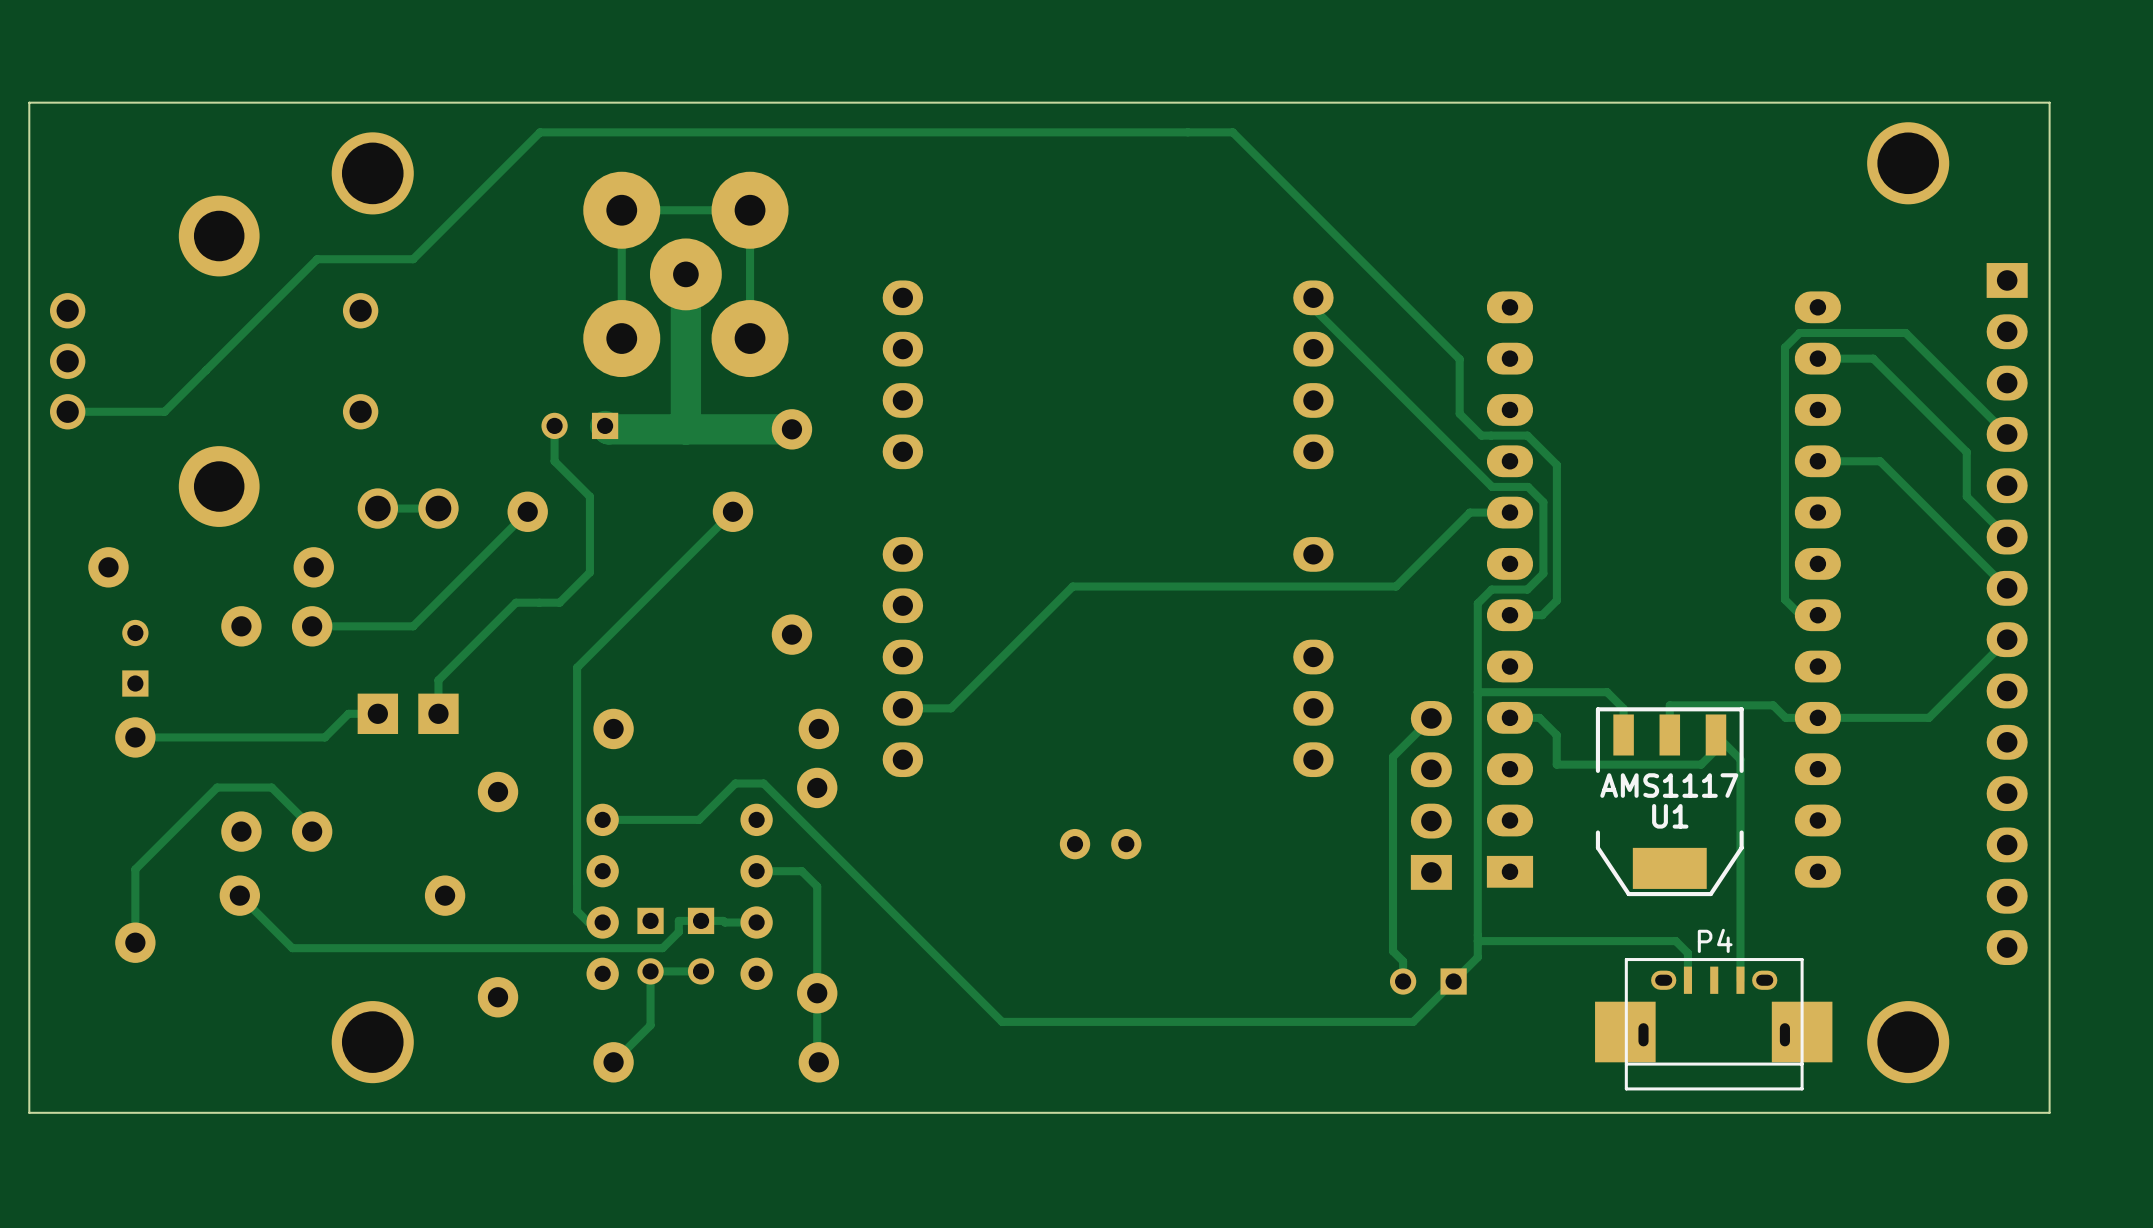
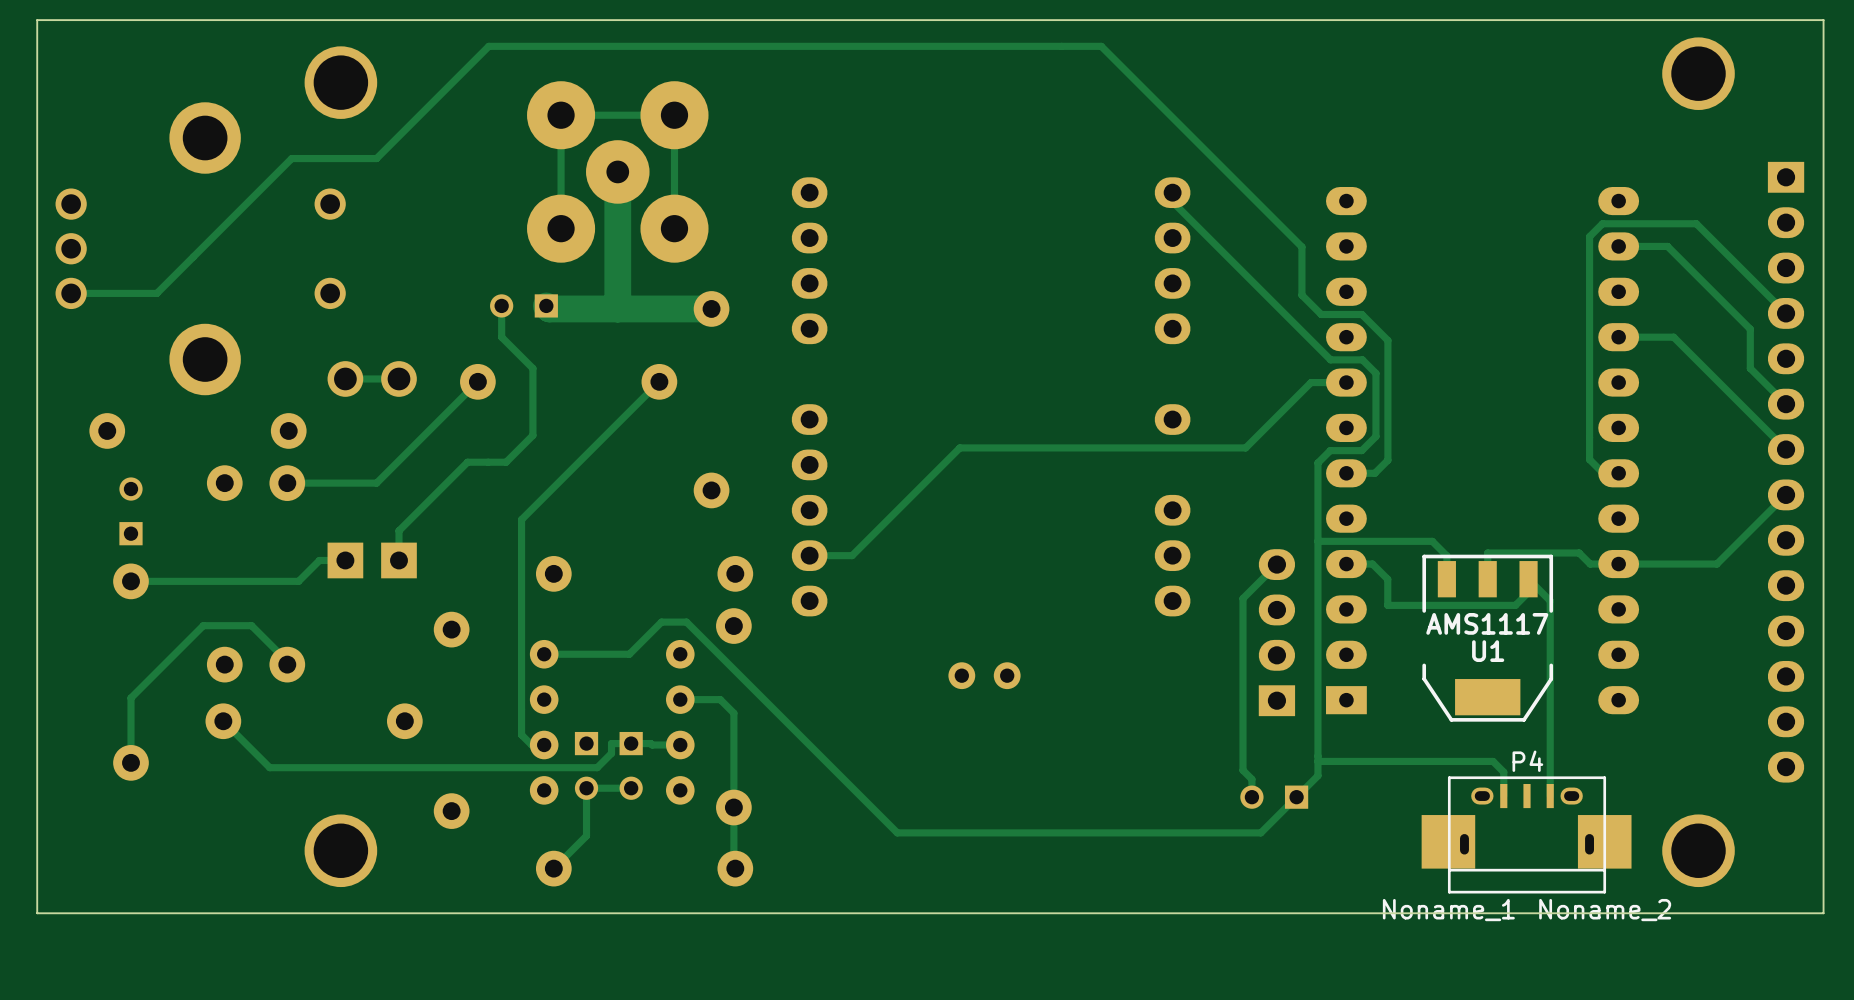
Noname_1 name: none -> Noname_1 (1448, 910)
Noname_2 name: none -> Noname_2 (1605, 910)

